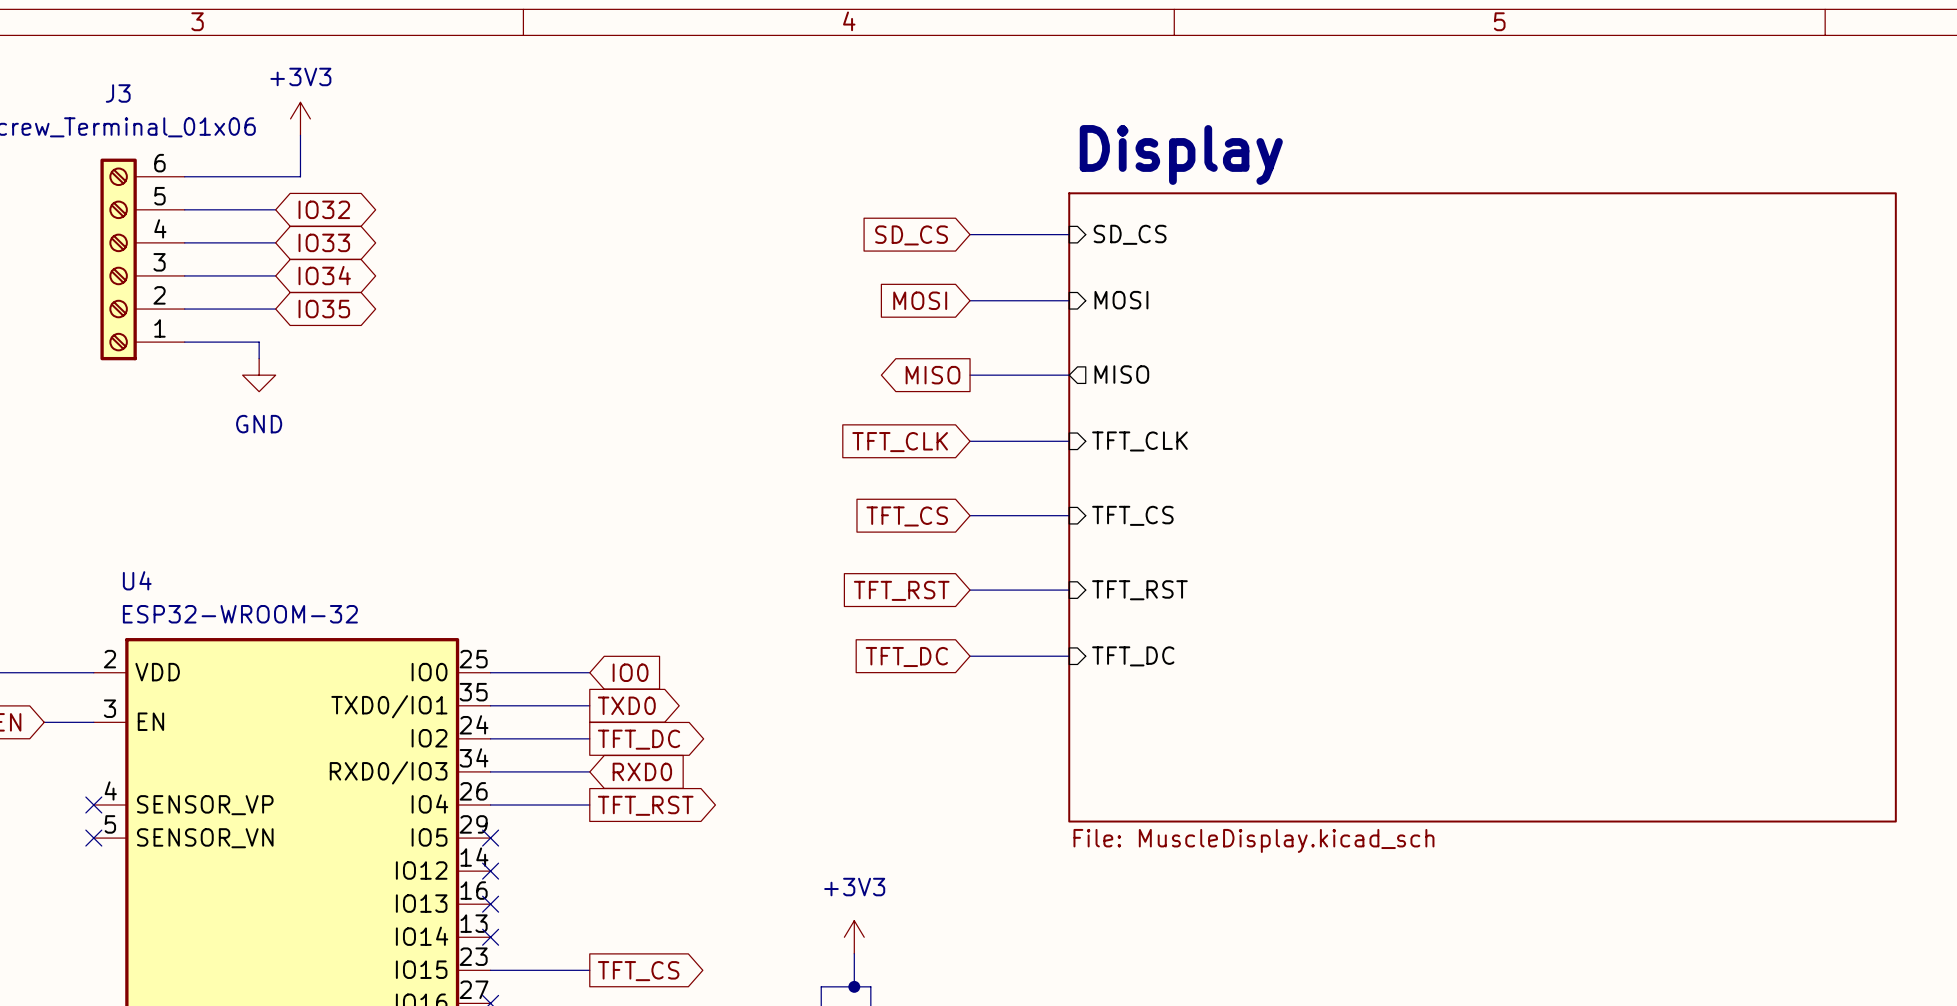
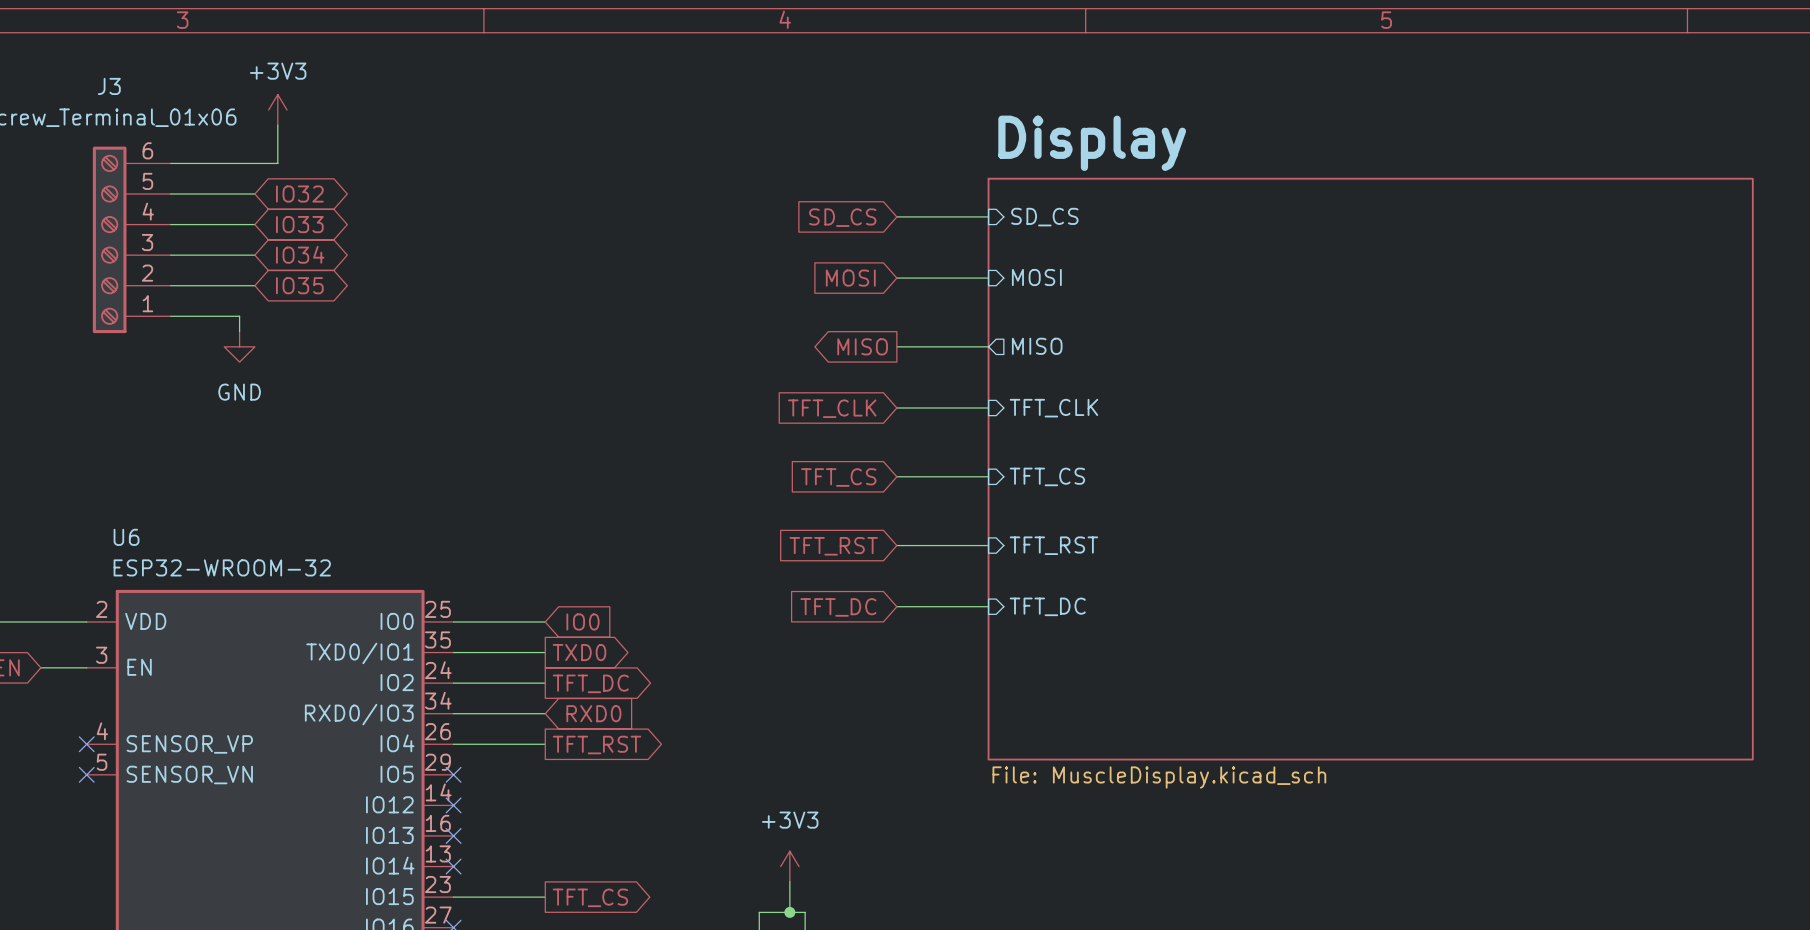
U4 name: U4 (137, 580) -> U6 (126, 537)

